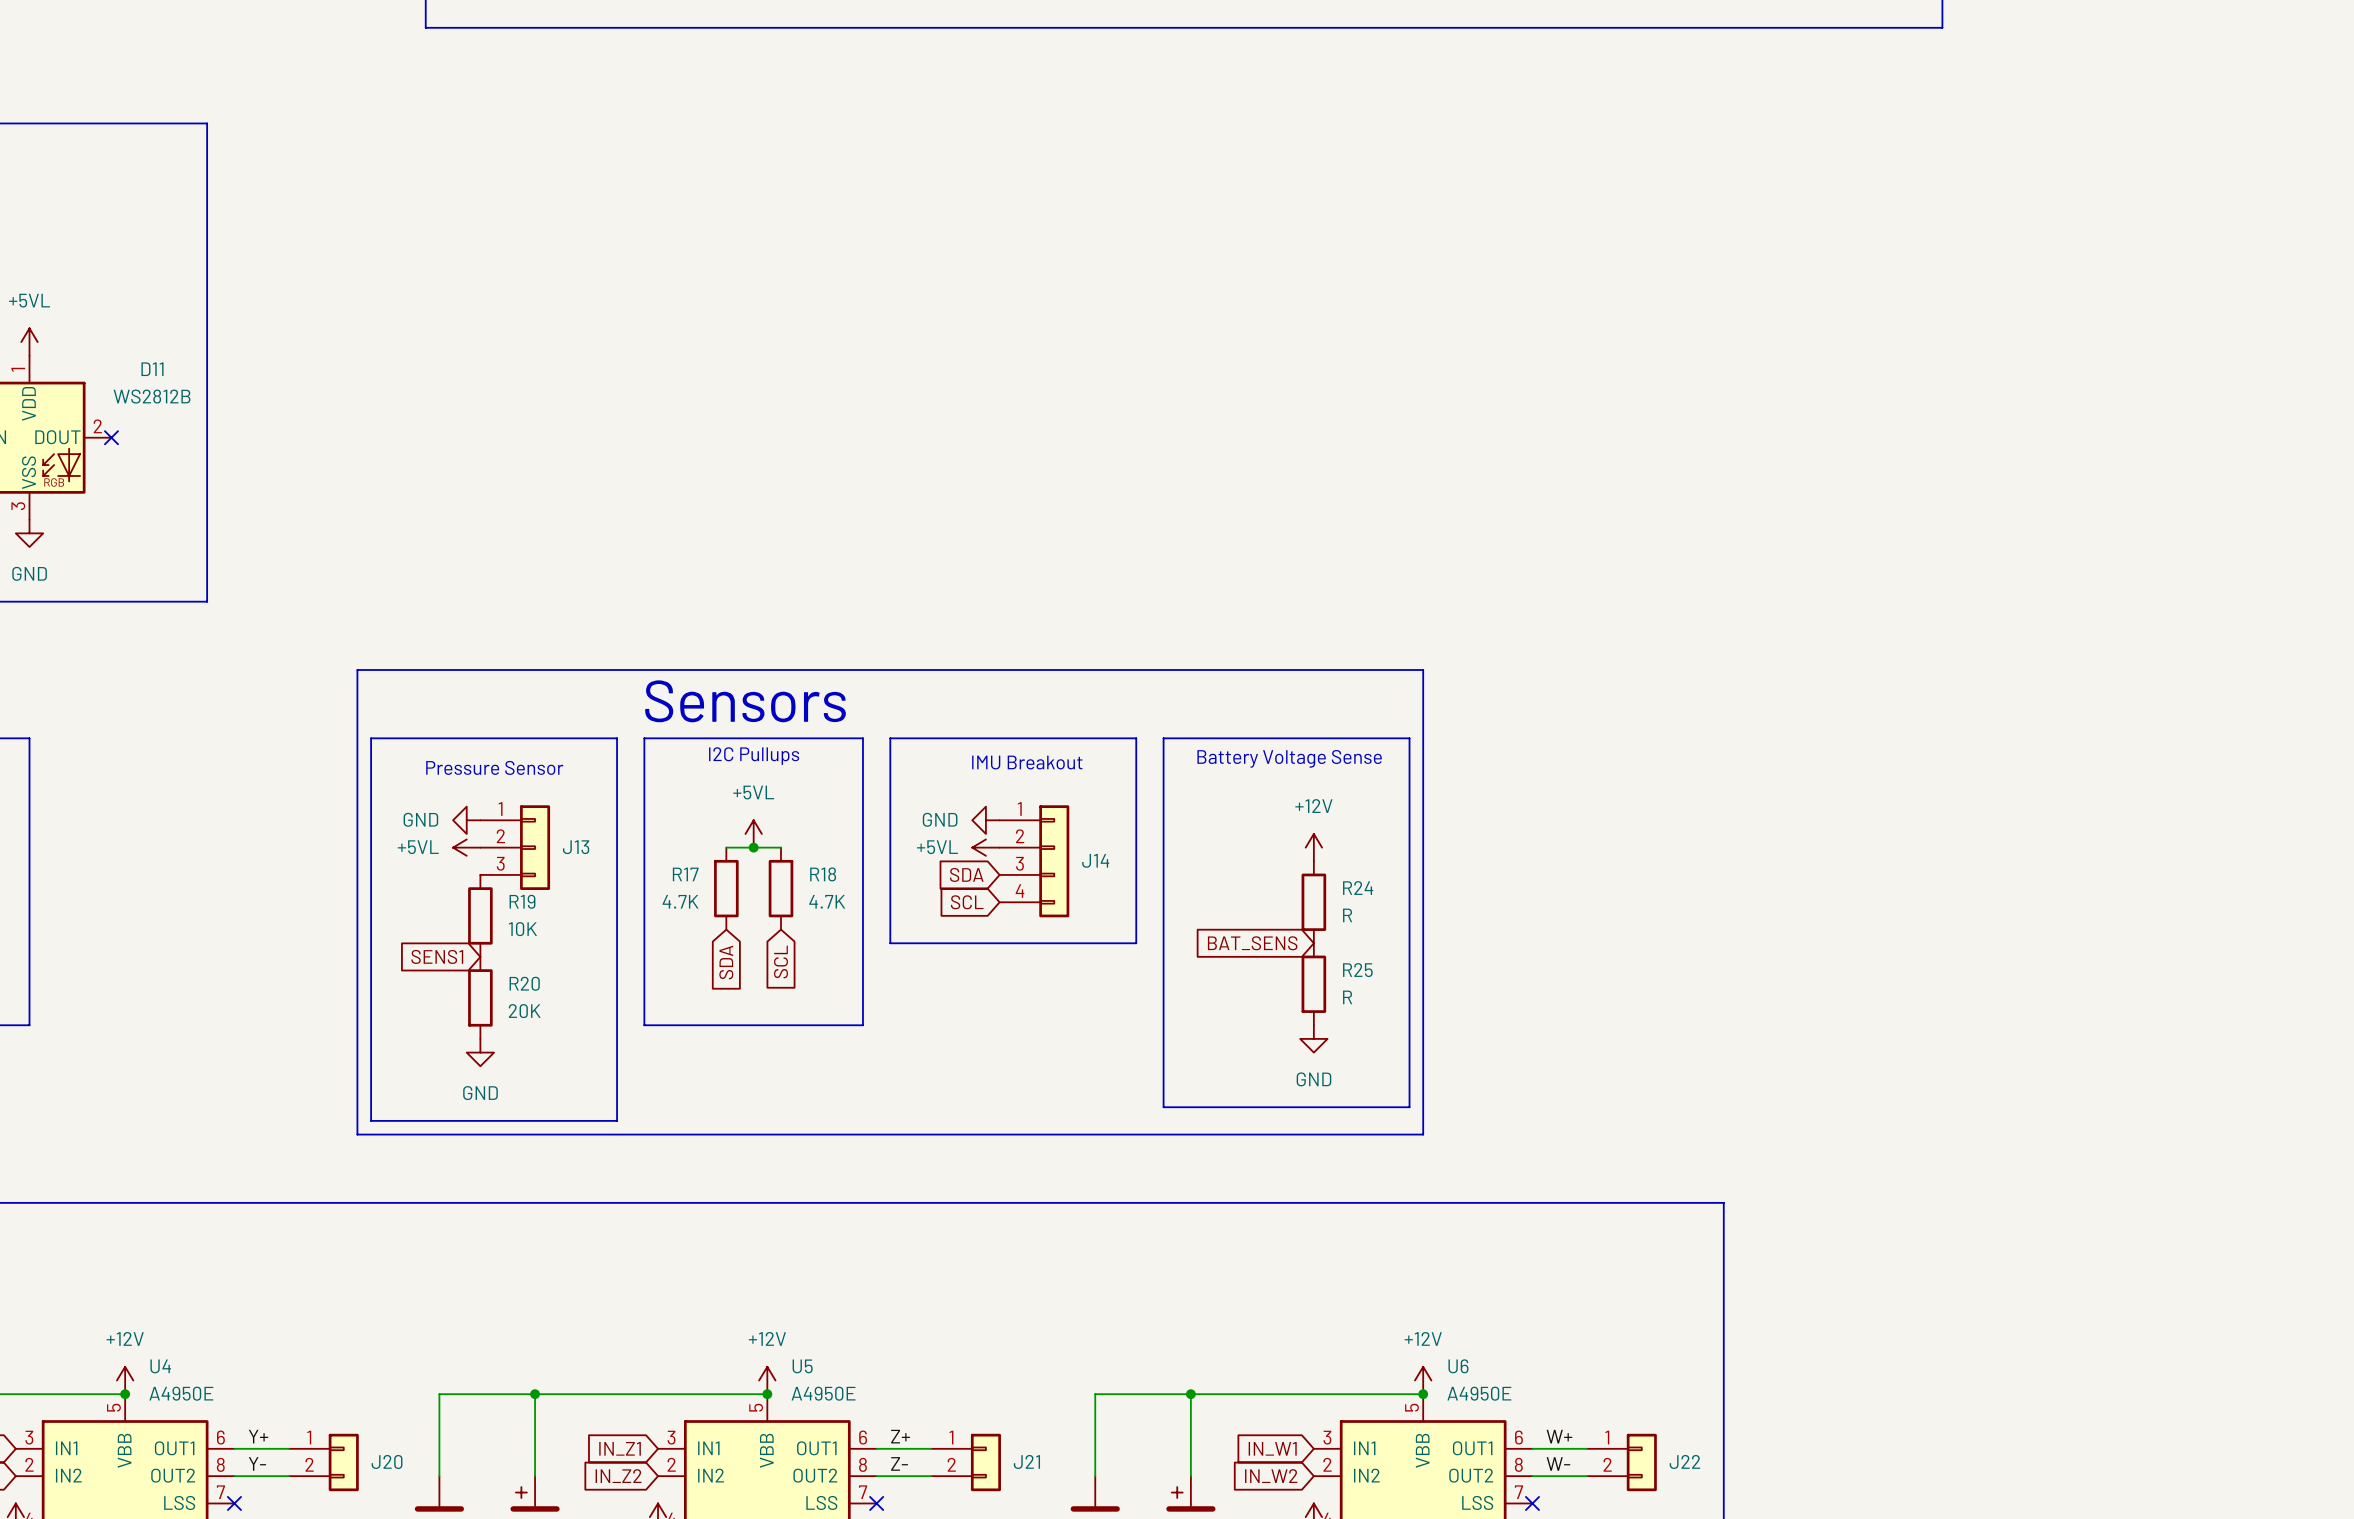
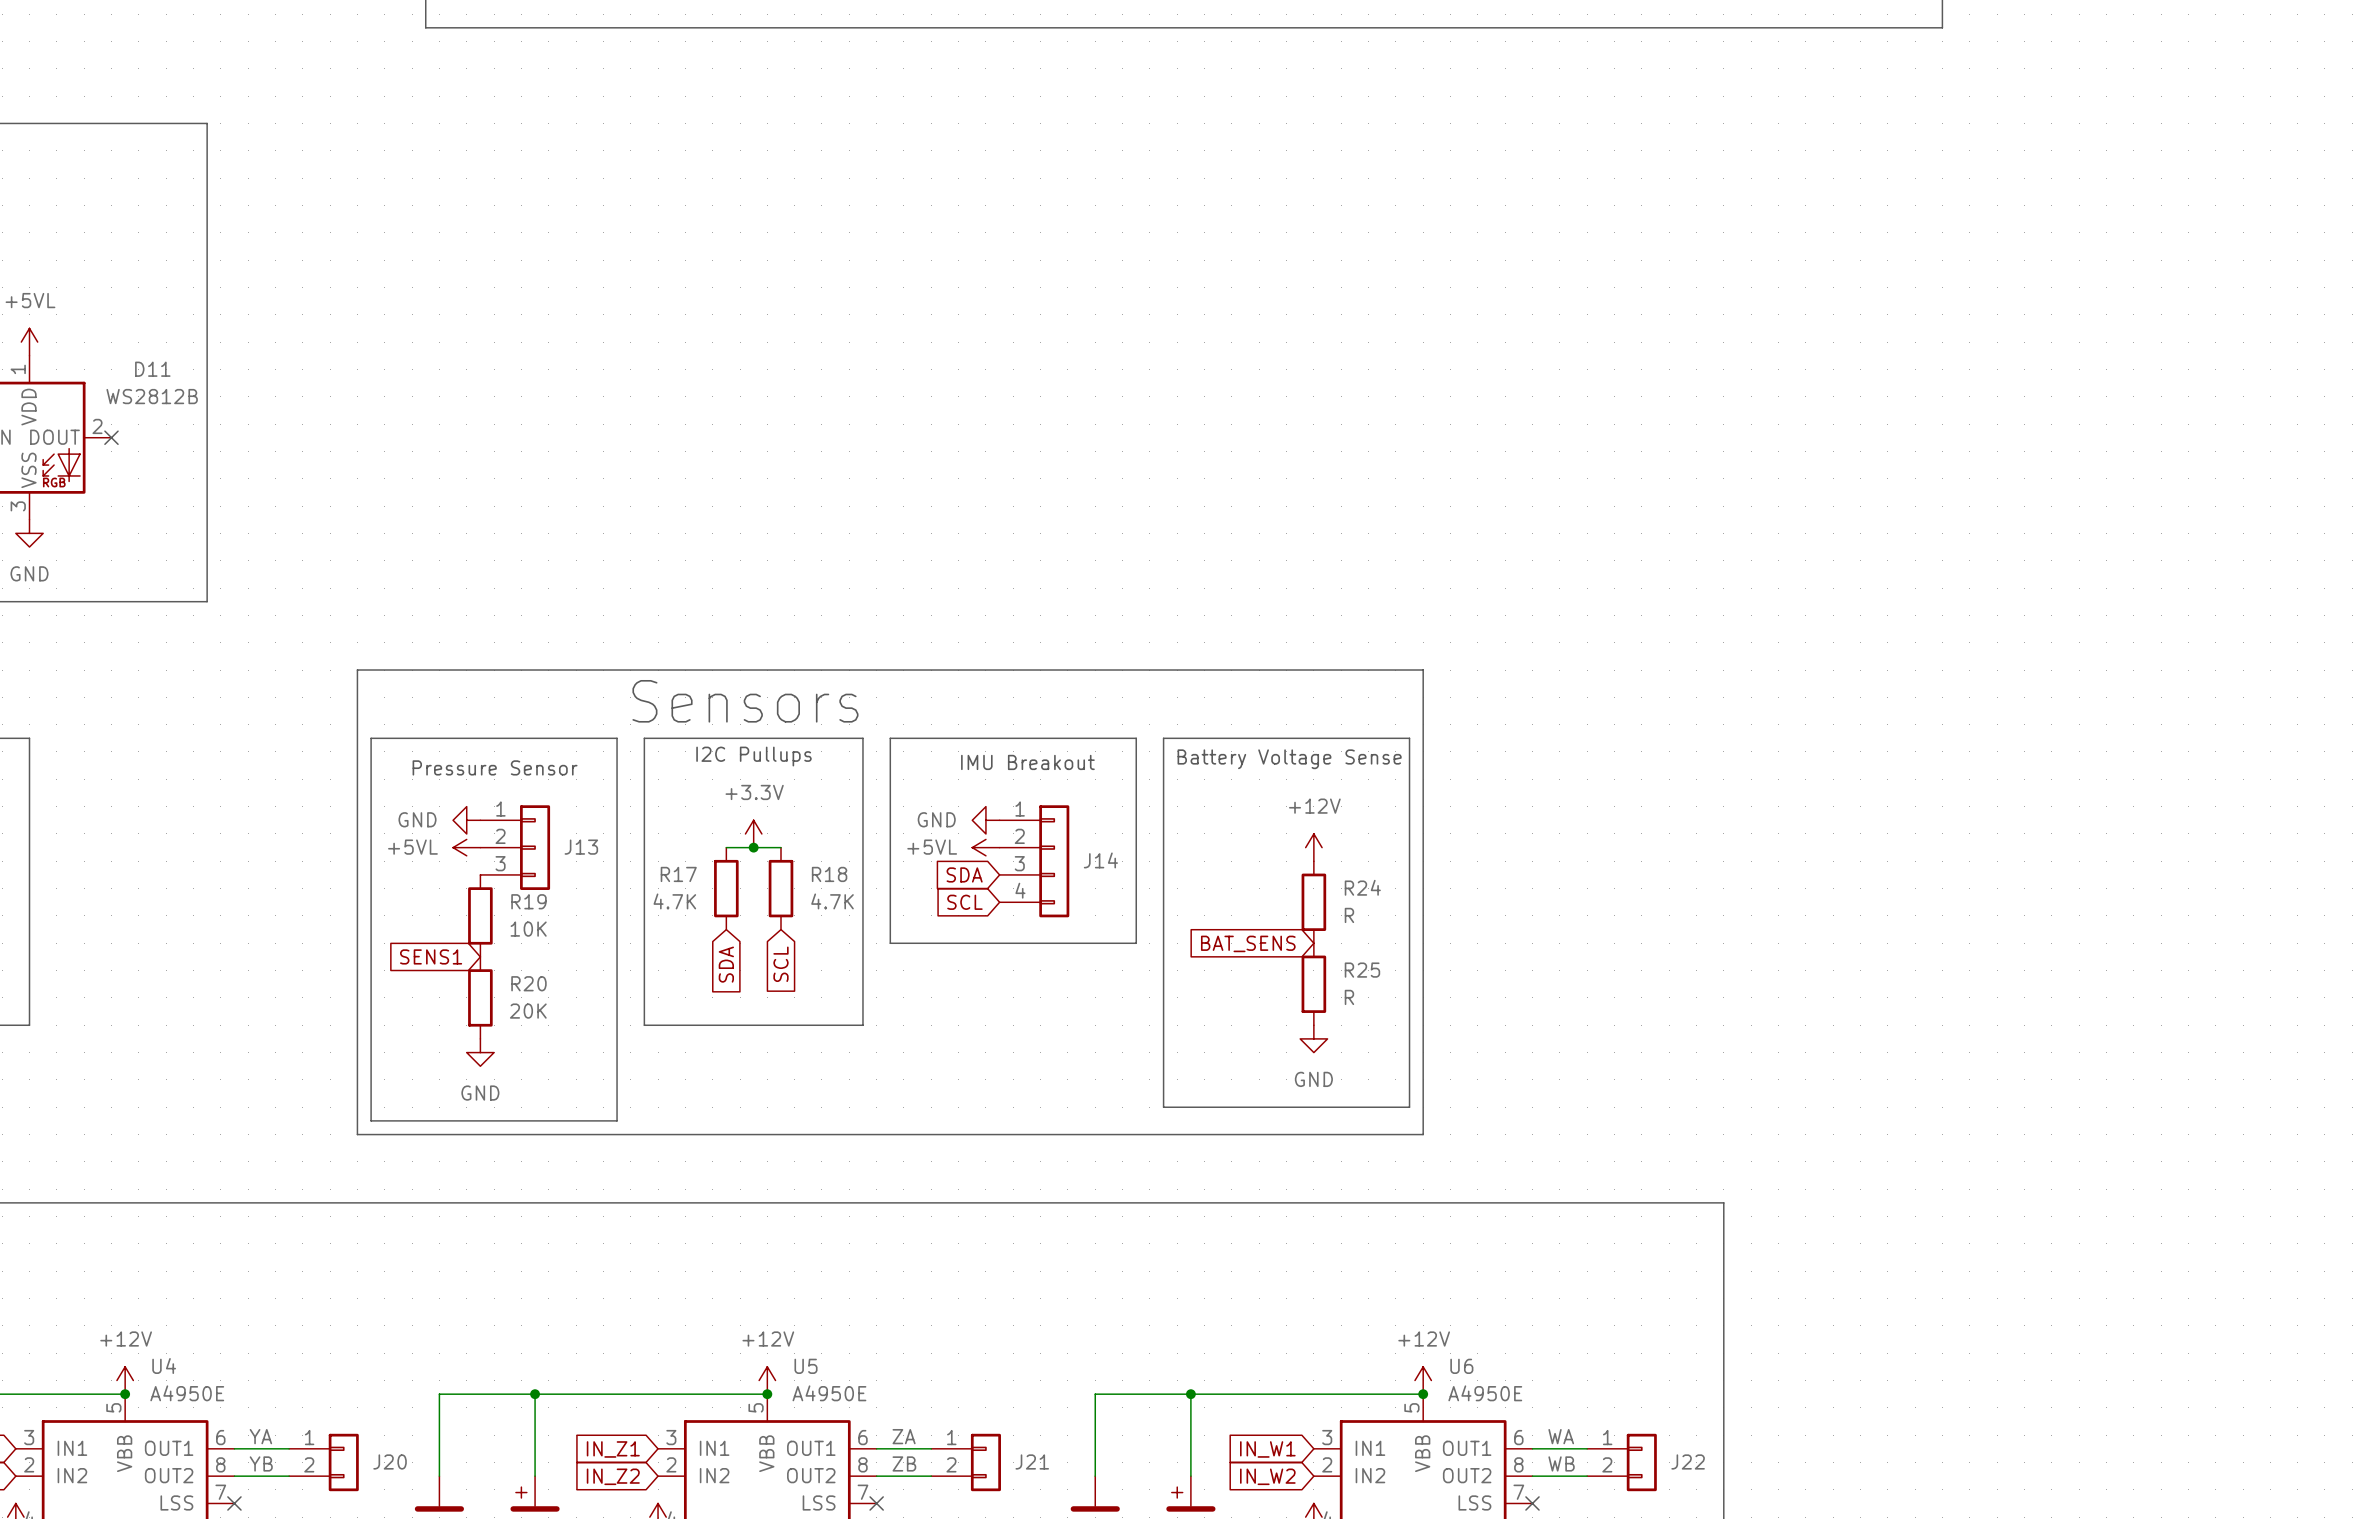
power symbol: +5VL (753, 833) -> +3.3V (753, 833)
label: Y+ (258, 1436) -> YA (260, 1436)
label: Z+ (900, 1436) -> ZA (904, 1436)
label: W+ (1559, 1436) -> WA (1561, 1436)
label: Y- (257, 1463) -> YB (261, 1463)
label: Z- (899, 1463) -> ZB (904, 1463)
label: W- (1558, 1463) -> WB (1561, 1463)

